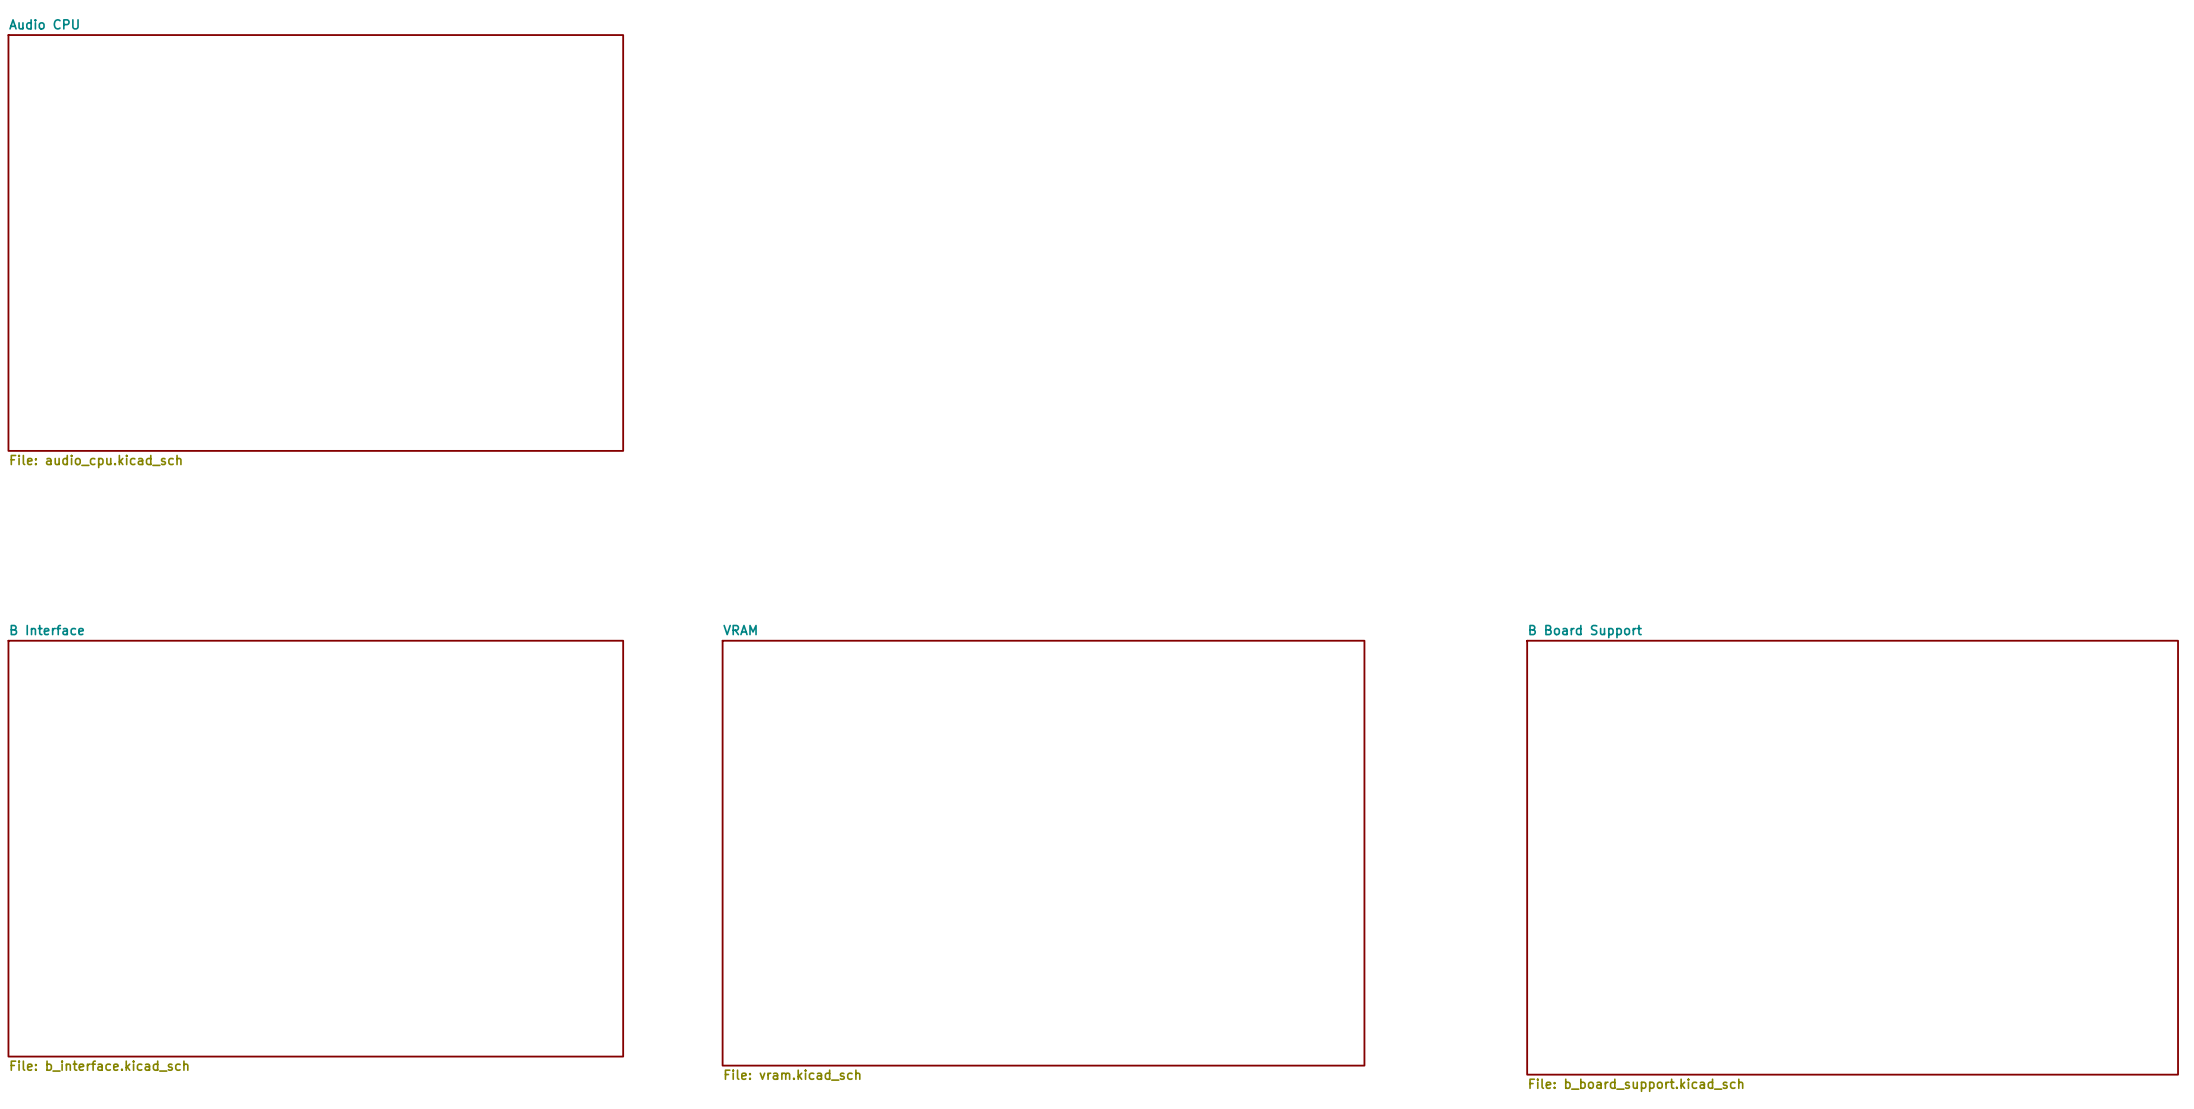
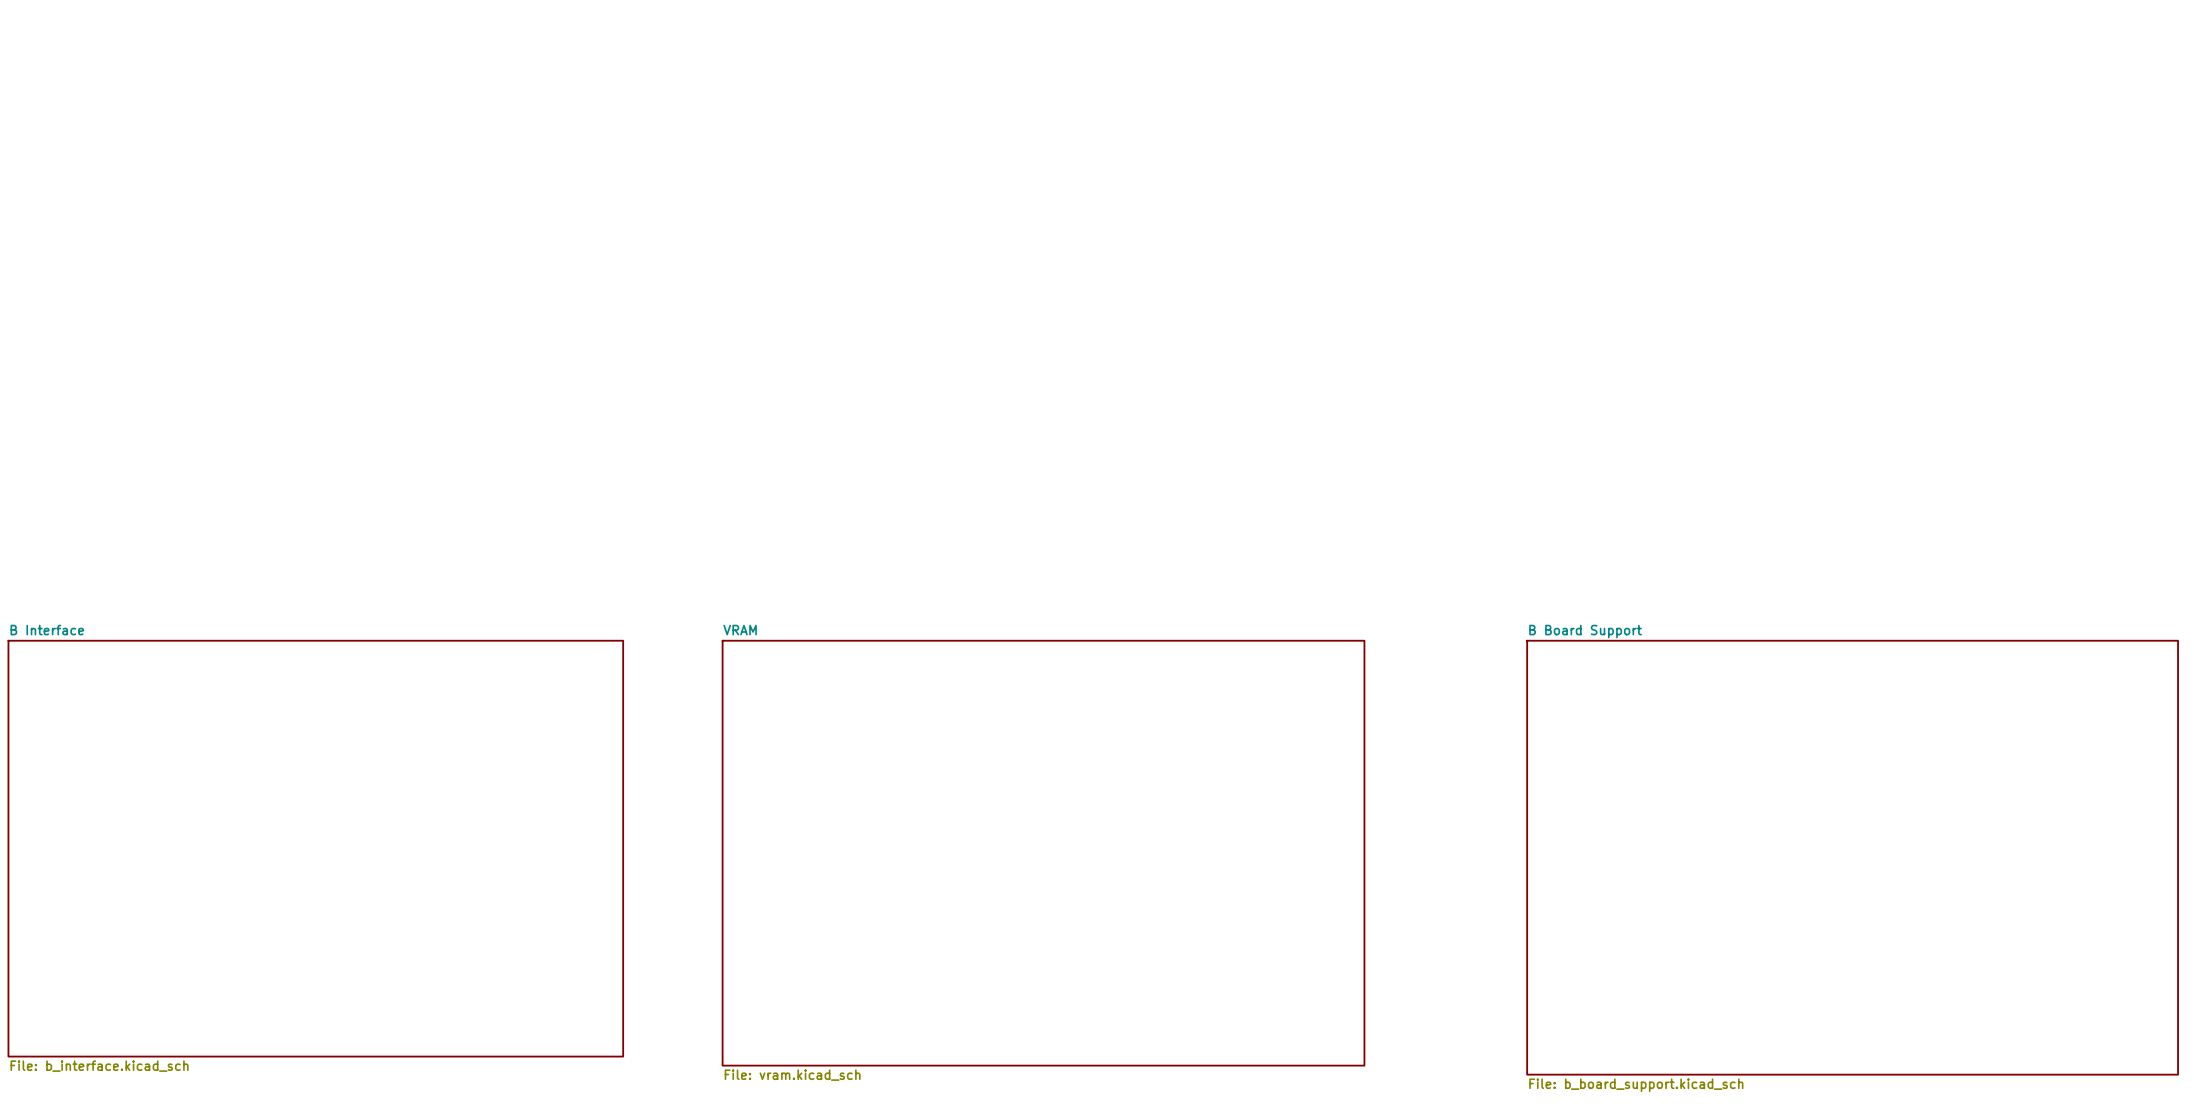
sheet Audio CPU: File: audio_cpu.kicad_sch (315, 242) -> none

